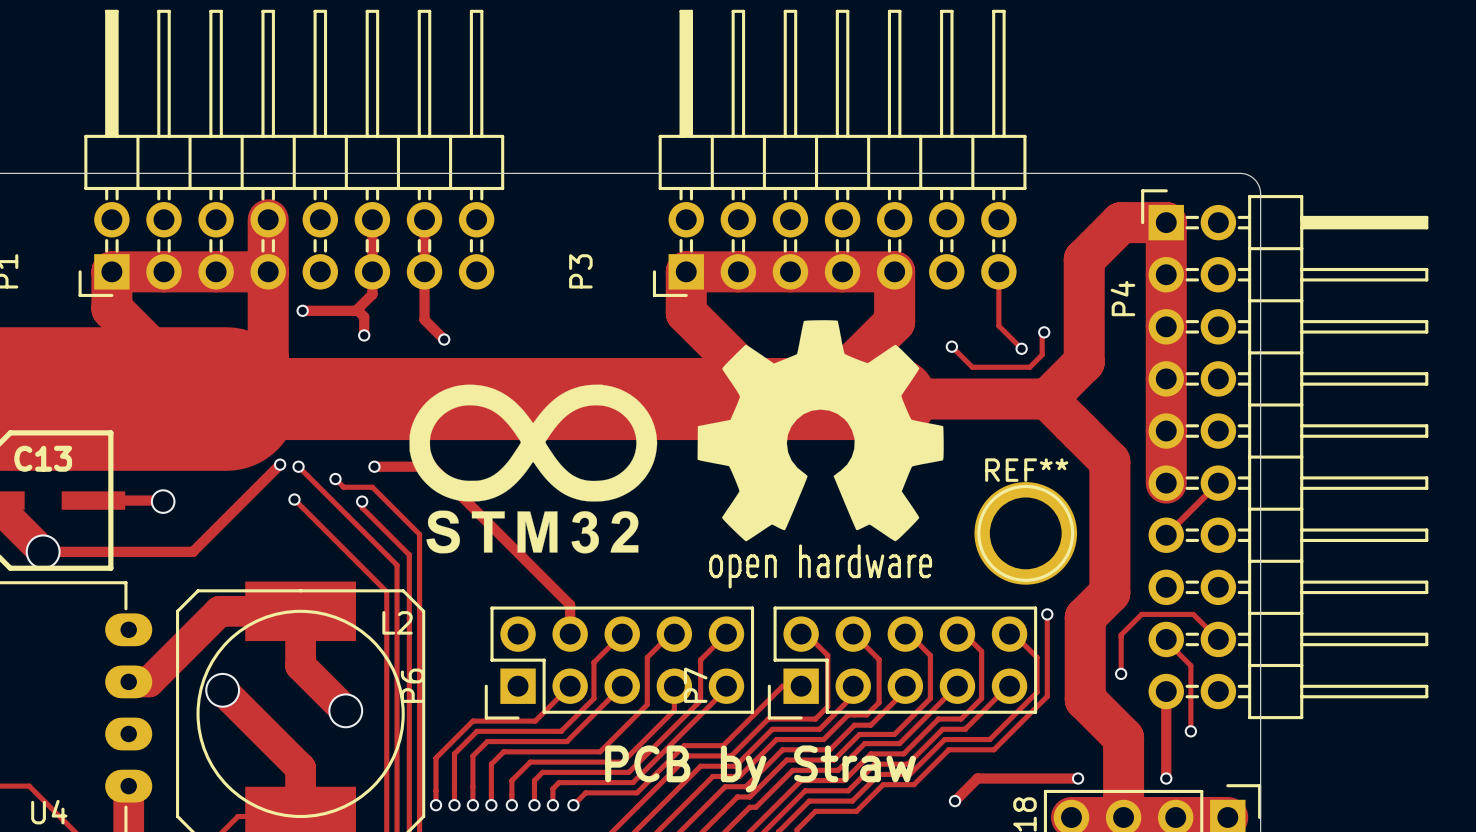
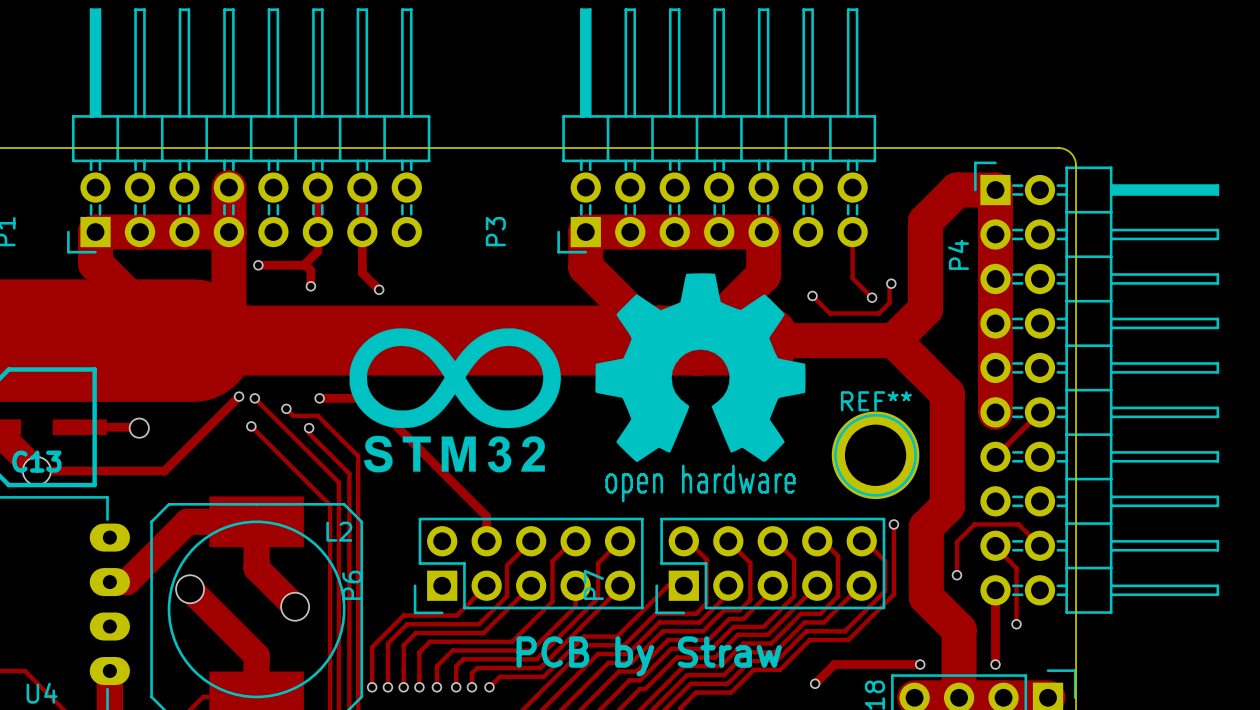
C13 name position: C13 (43, 458) -> C13 (36, 461)

